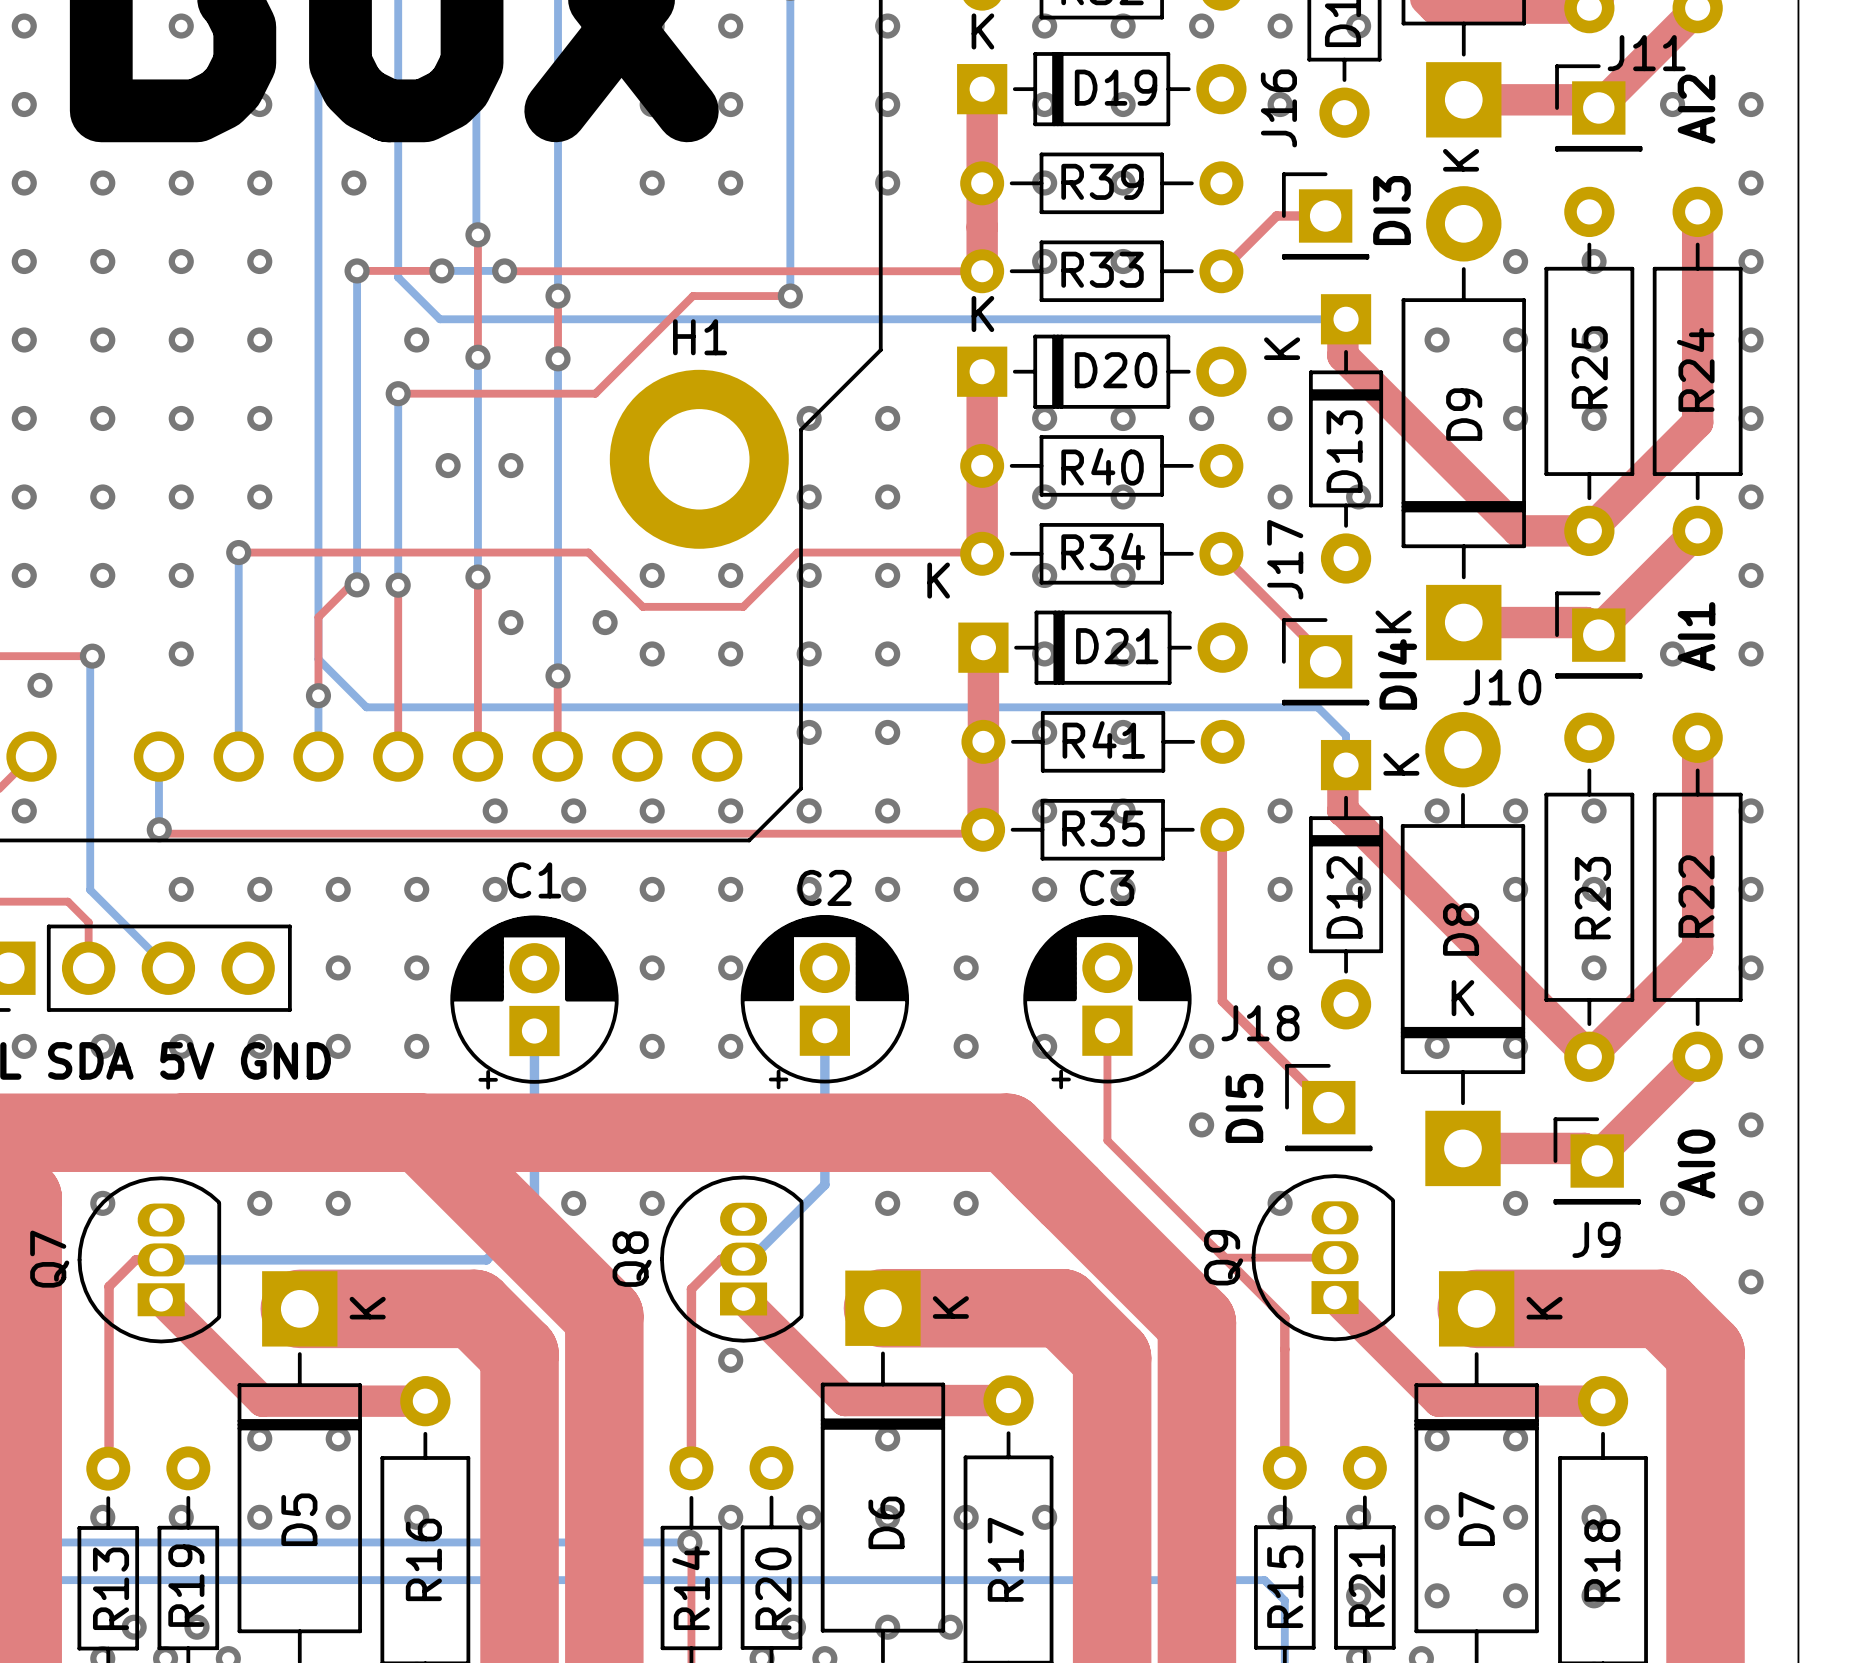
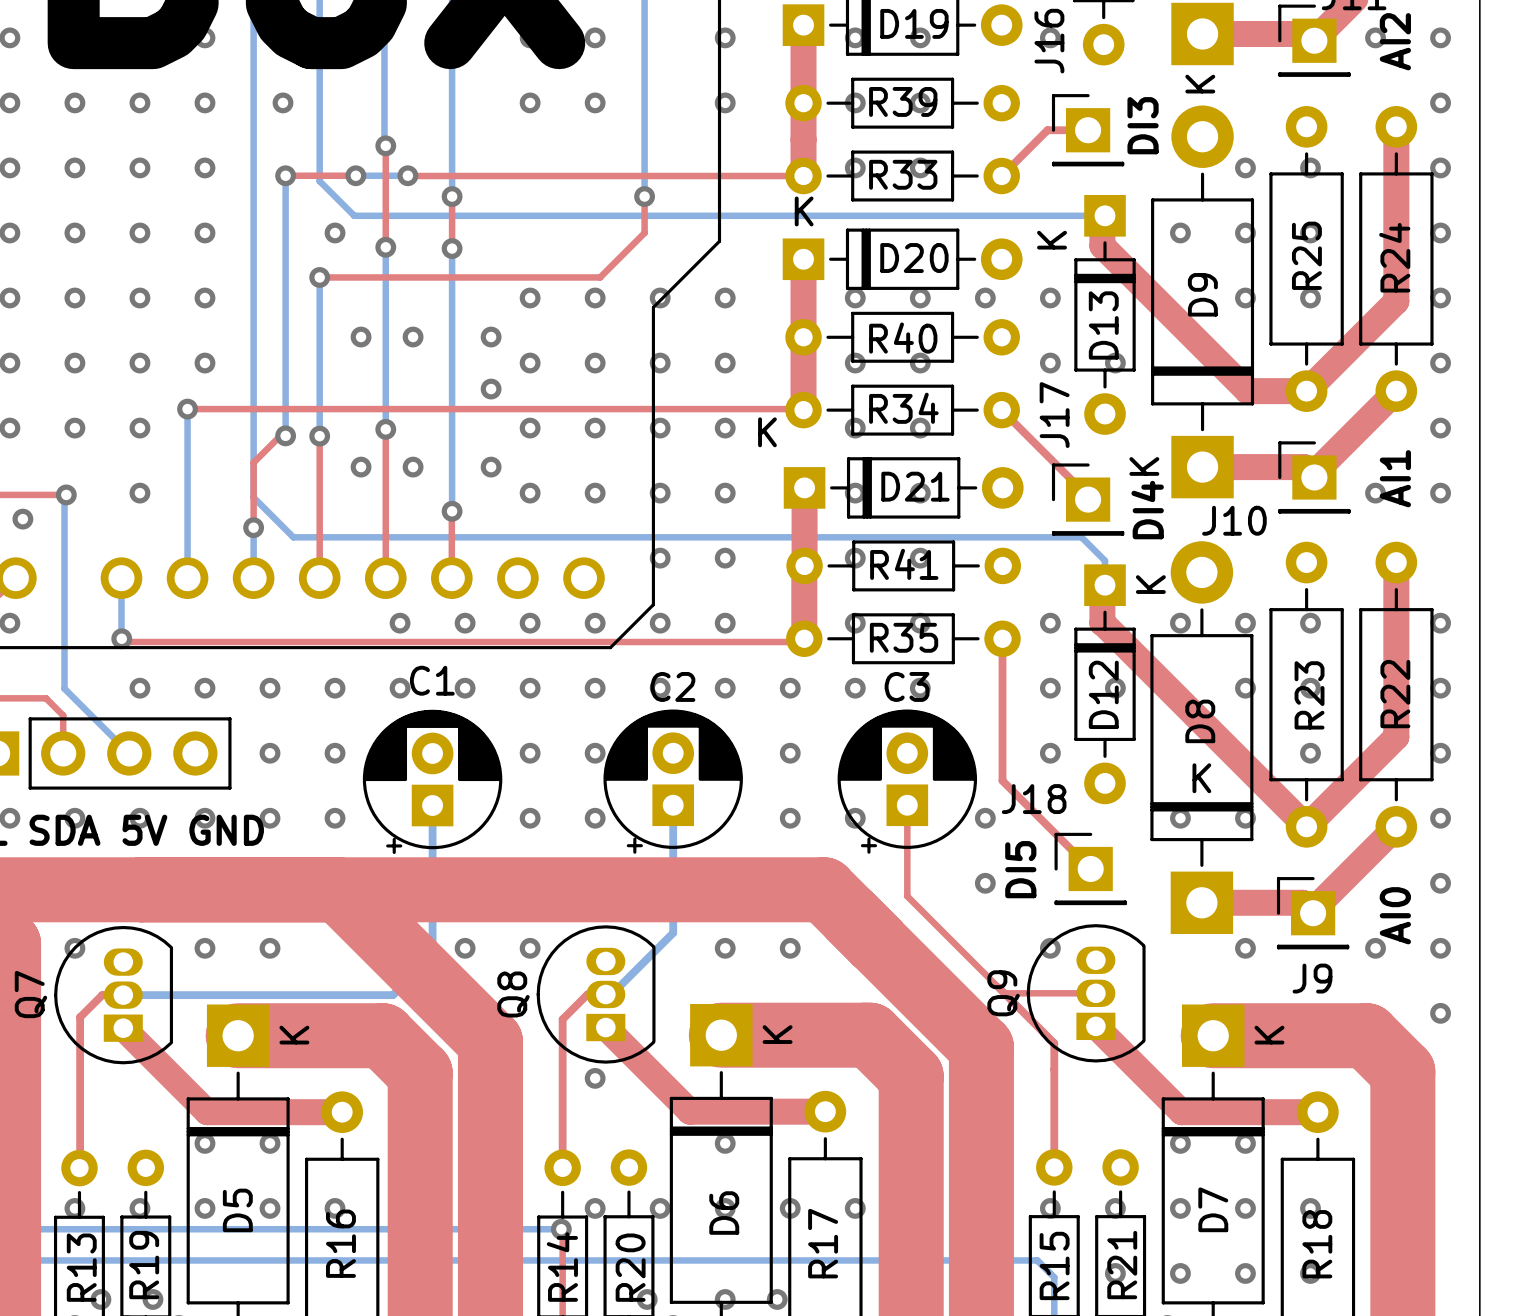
top track: (790, 296) (693, 296) (595, 393) -> (644, 196) (644, 232) (600, 277) (483, 277)
via: none -> (530, 298)
via: none -> (595, 298)
H1: (699, 459) -> none
via: none -> (491, 337)
via: none -> (530, 363)
via: none -> (595, 363)
via: none -> (491, 389)
top track: (588, 552) (642, 606) (743, 606) (797, 552) -> (477, 409) (650, 409)
via: none -> (361, 467)

